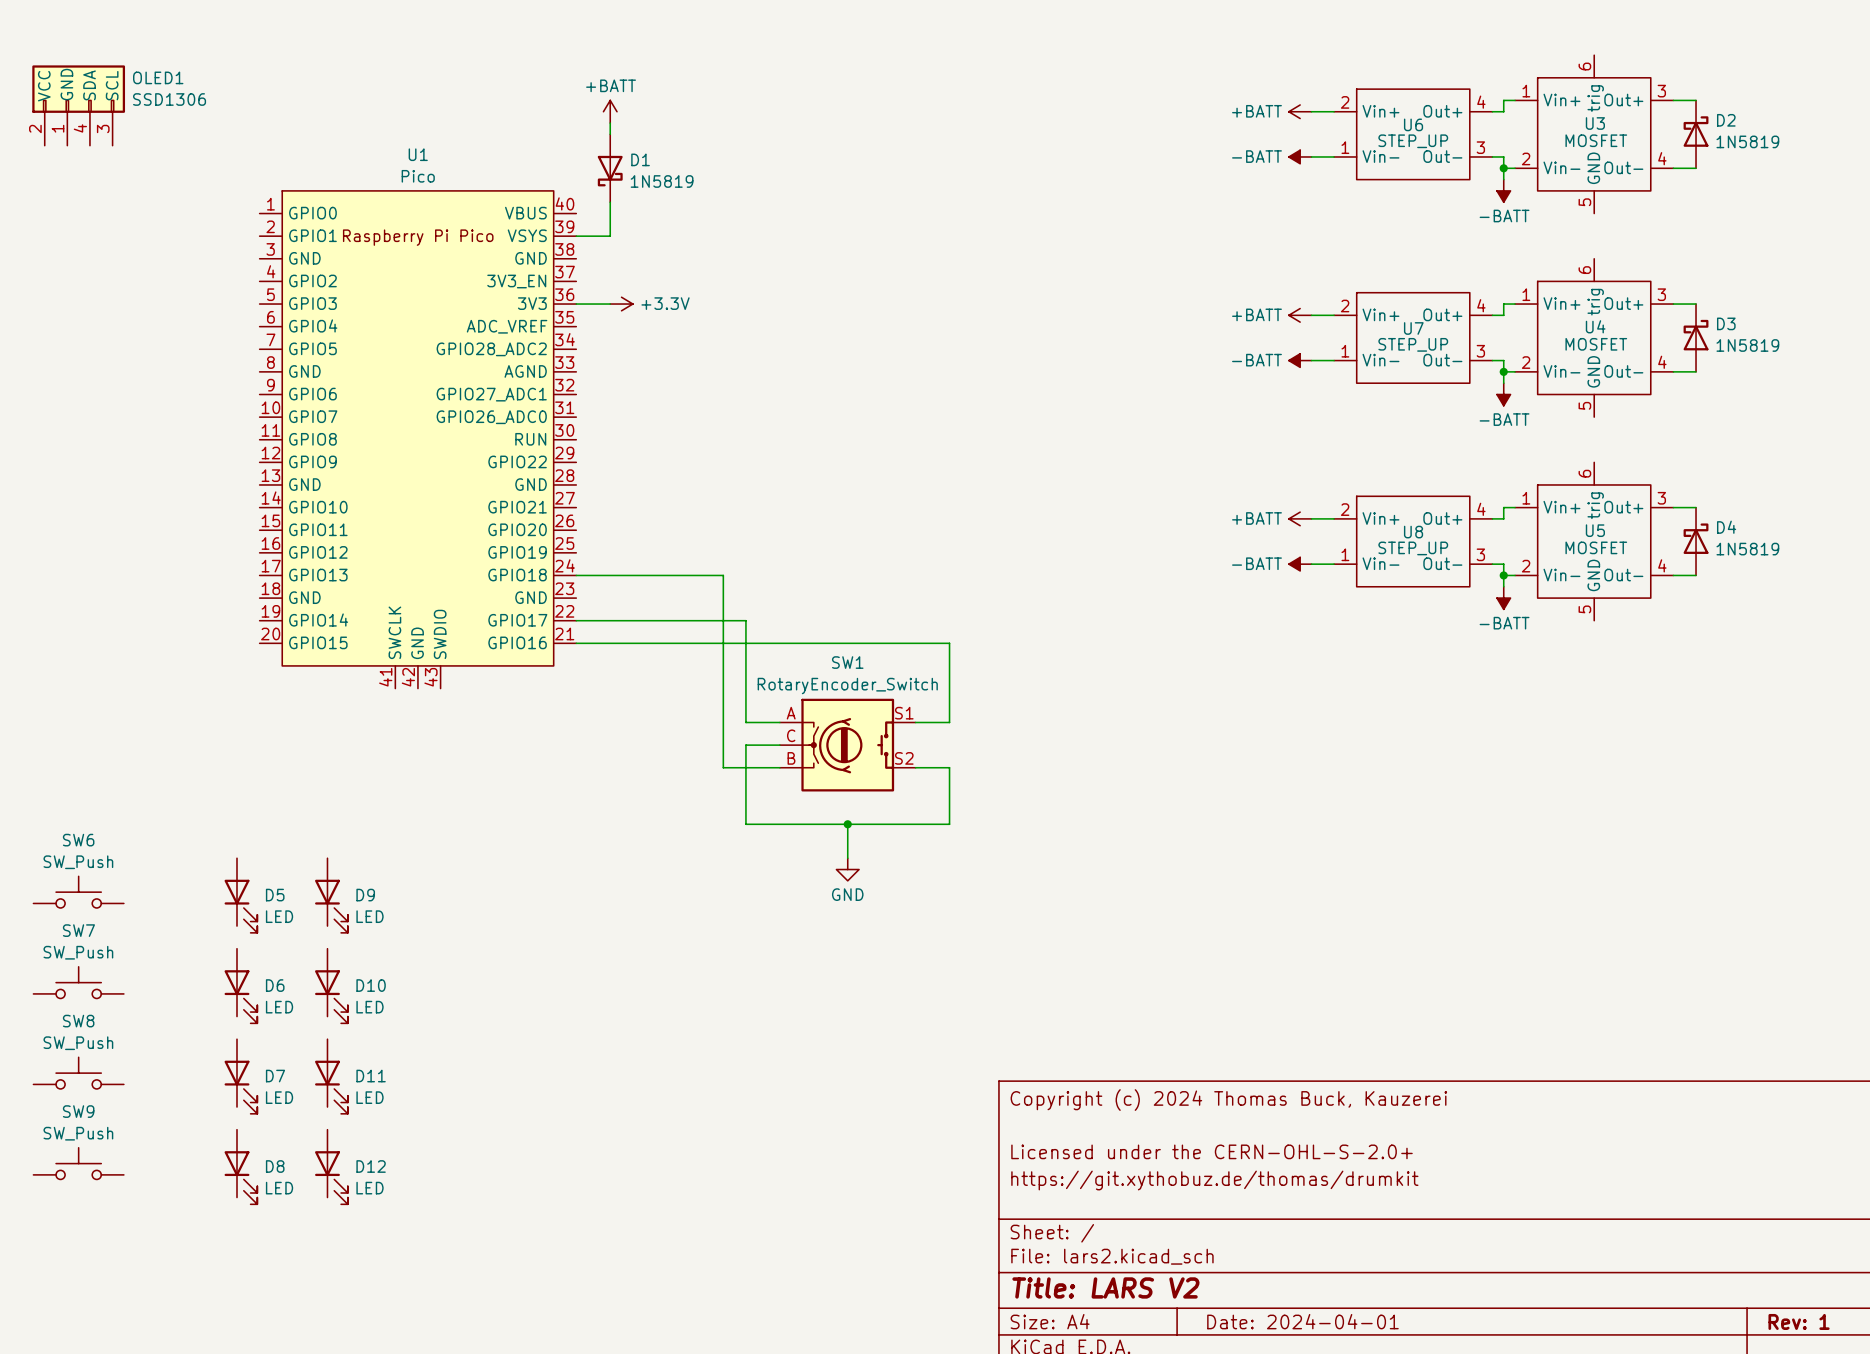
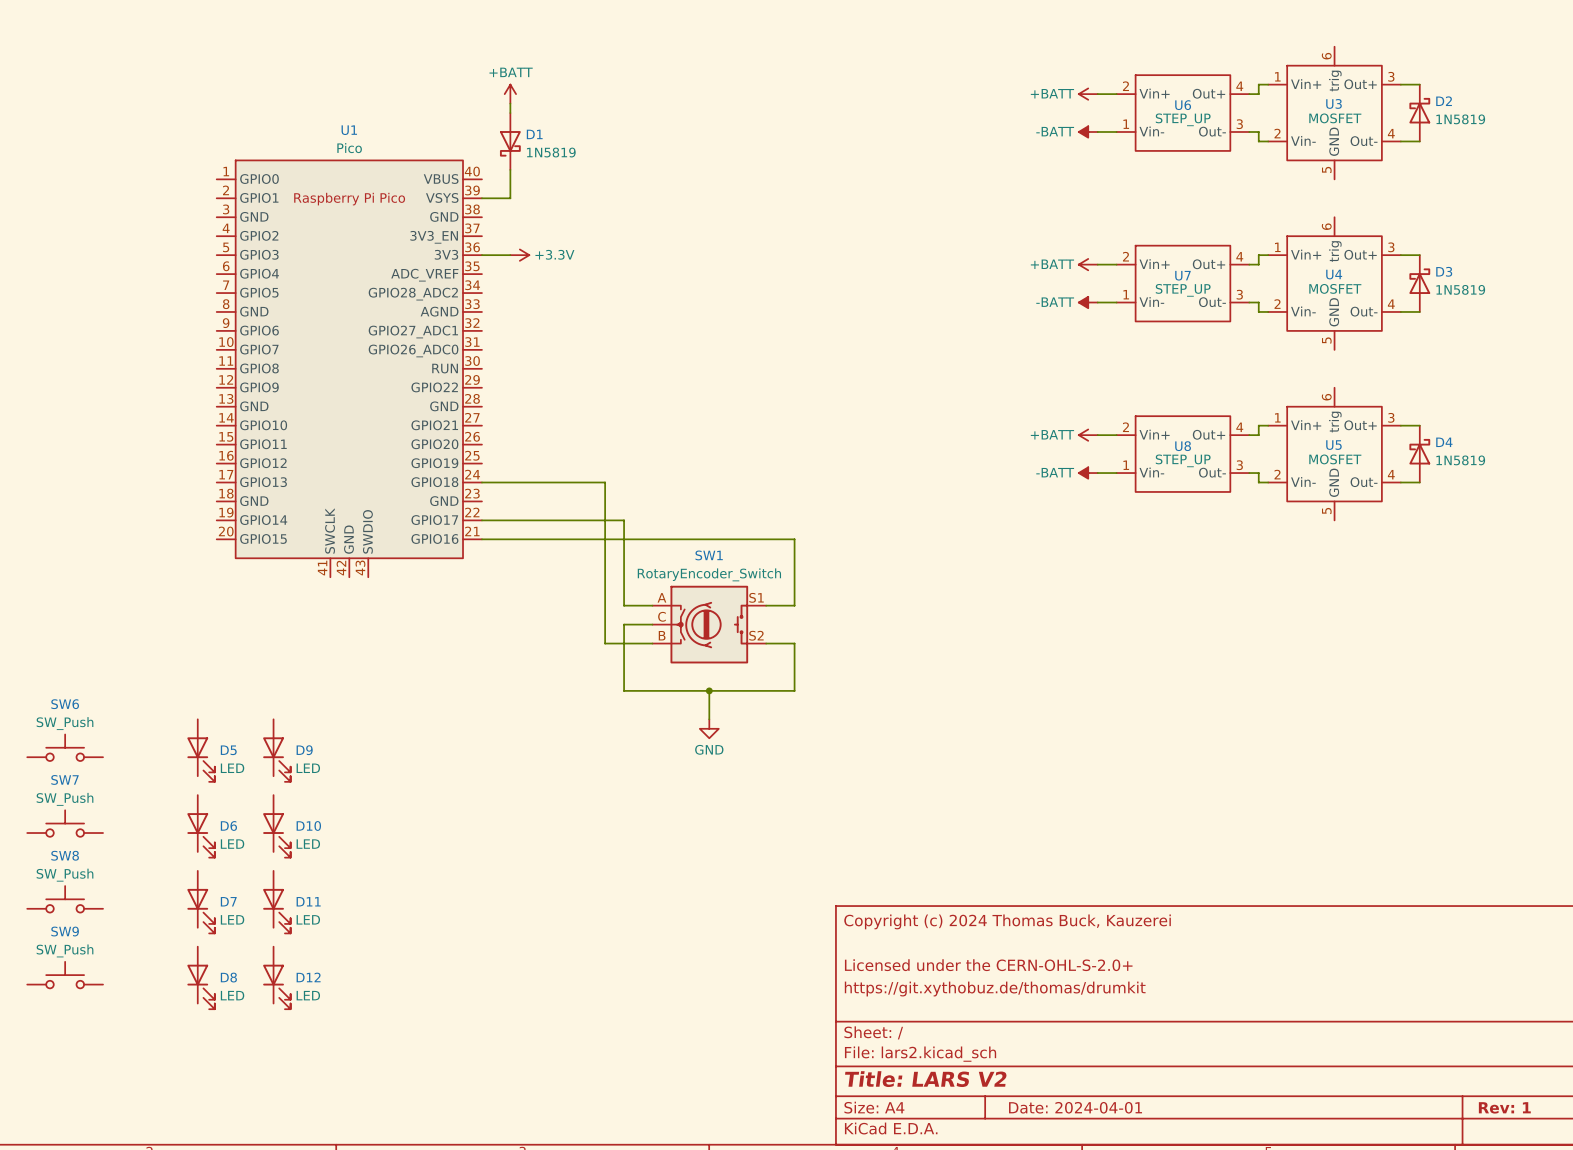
OLED1: SSD1306 (78, 105) -> none
wire: (1503, 168) (1503, 179) -> none
junction: (1503, 168) -> none
power symbol: -BATT (1503, 190) -> none
wire: (1503, 371) (1503, 383) -> none
junction: (1503, 371) -> none
power symbol: -BATT (1503, 394) -> none
wire: (1503, 575) (1503, 586) -> none
junction: (1503, 575) -> none
power symbol: -BATT (1503, 598) -> none

